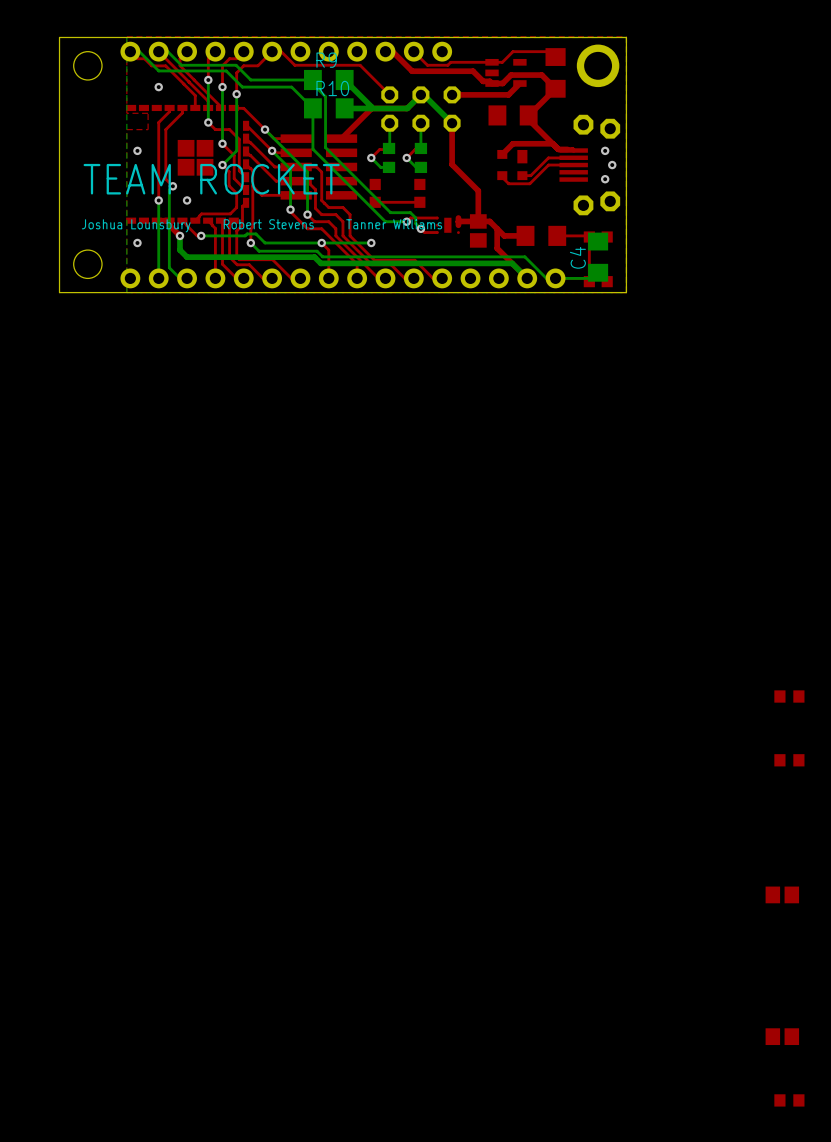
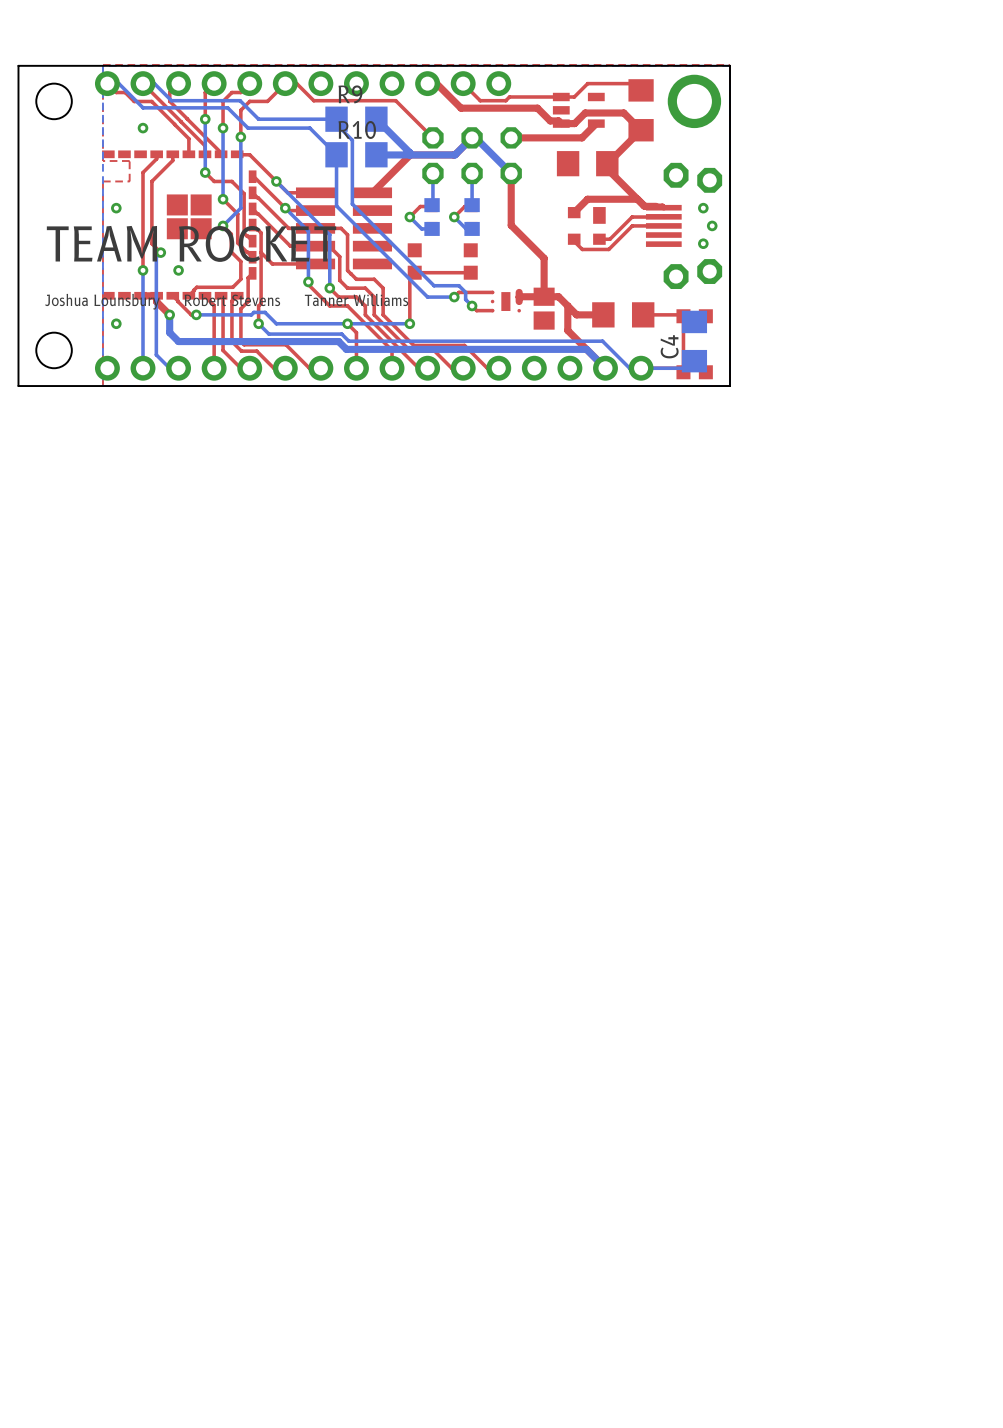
top track: none -> (414, 272) (409, 277) (409, 323)
part: (789, 696) -> none
part: (789, 760) -> none
part: (782, 894) -> none
part: (782, 1036) -> none
part: (789, 1100) -> none

